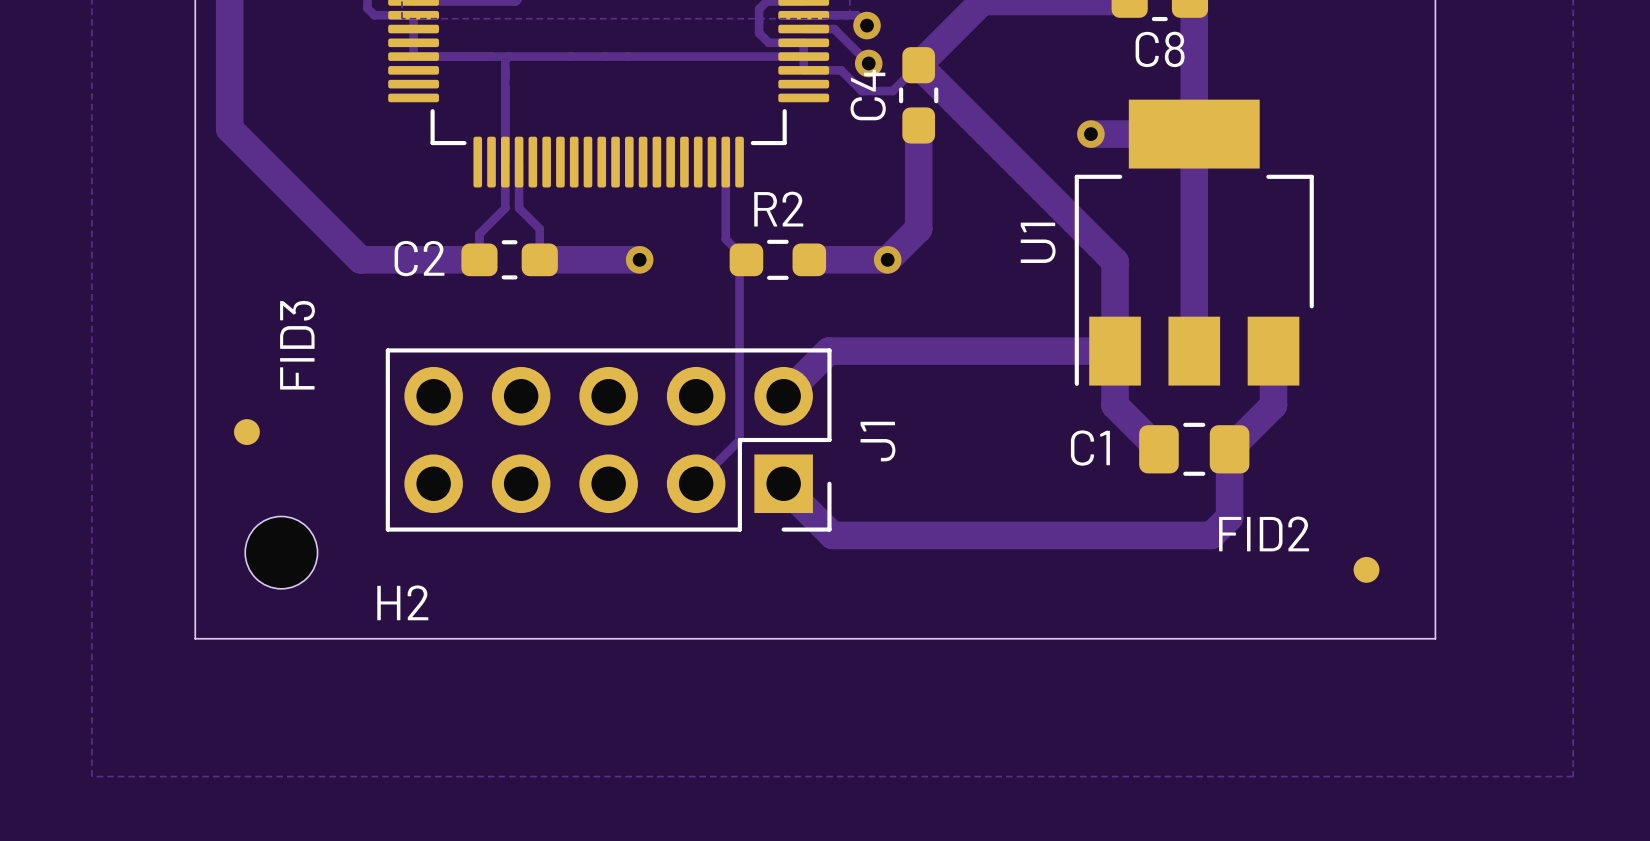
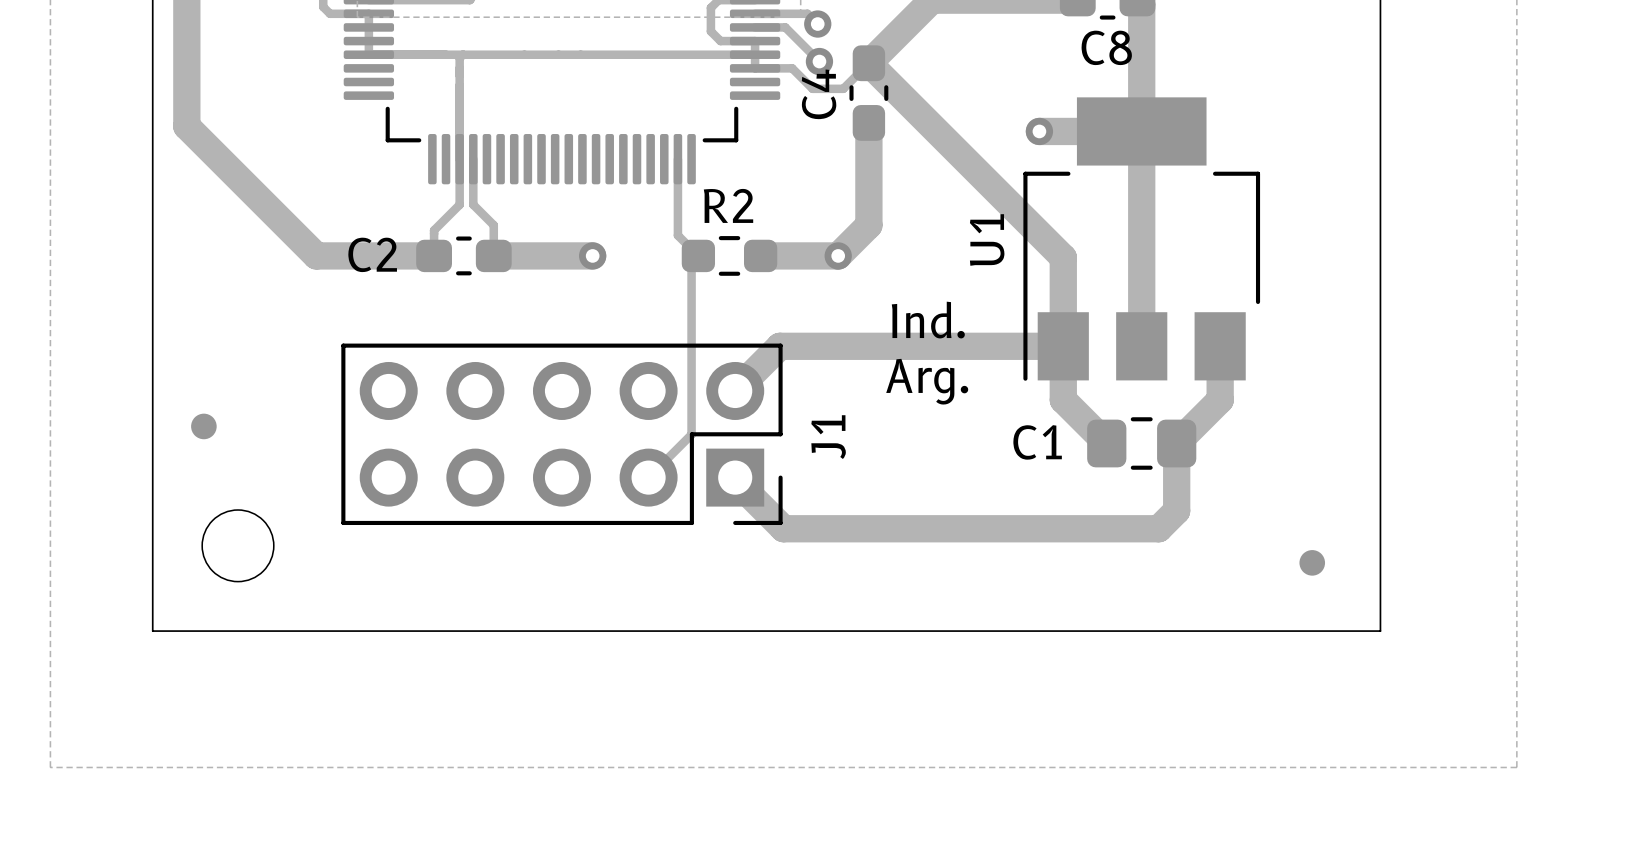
text: none -> Ind. (928, 320)
FID3 name: FID3 (297, 345) -> none
text: none -> Arg. (927, 381)
FID2 name: FID2 (1264, 533) -> none
H2 name: H2 (402, 602) -> none

